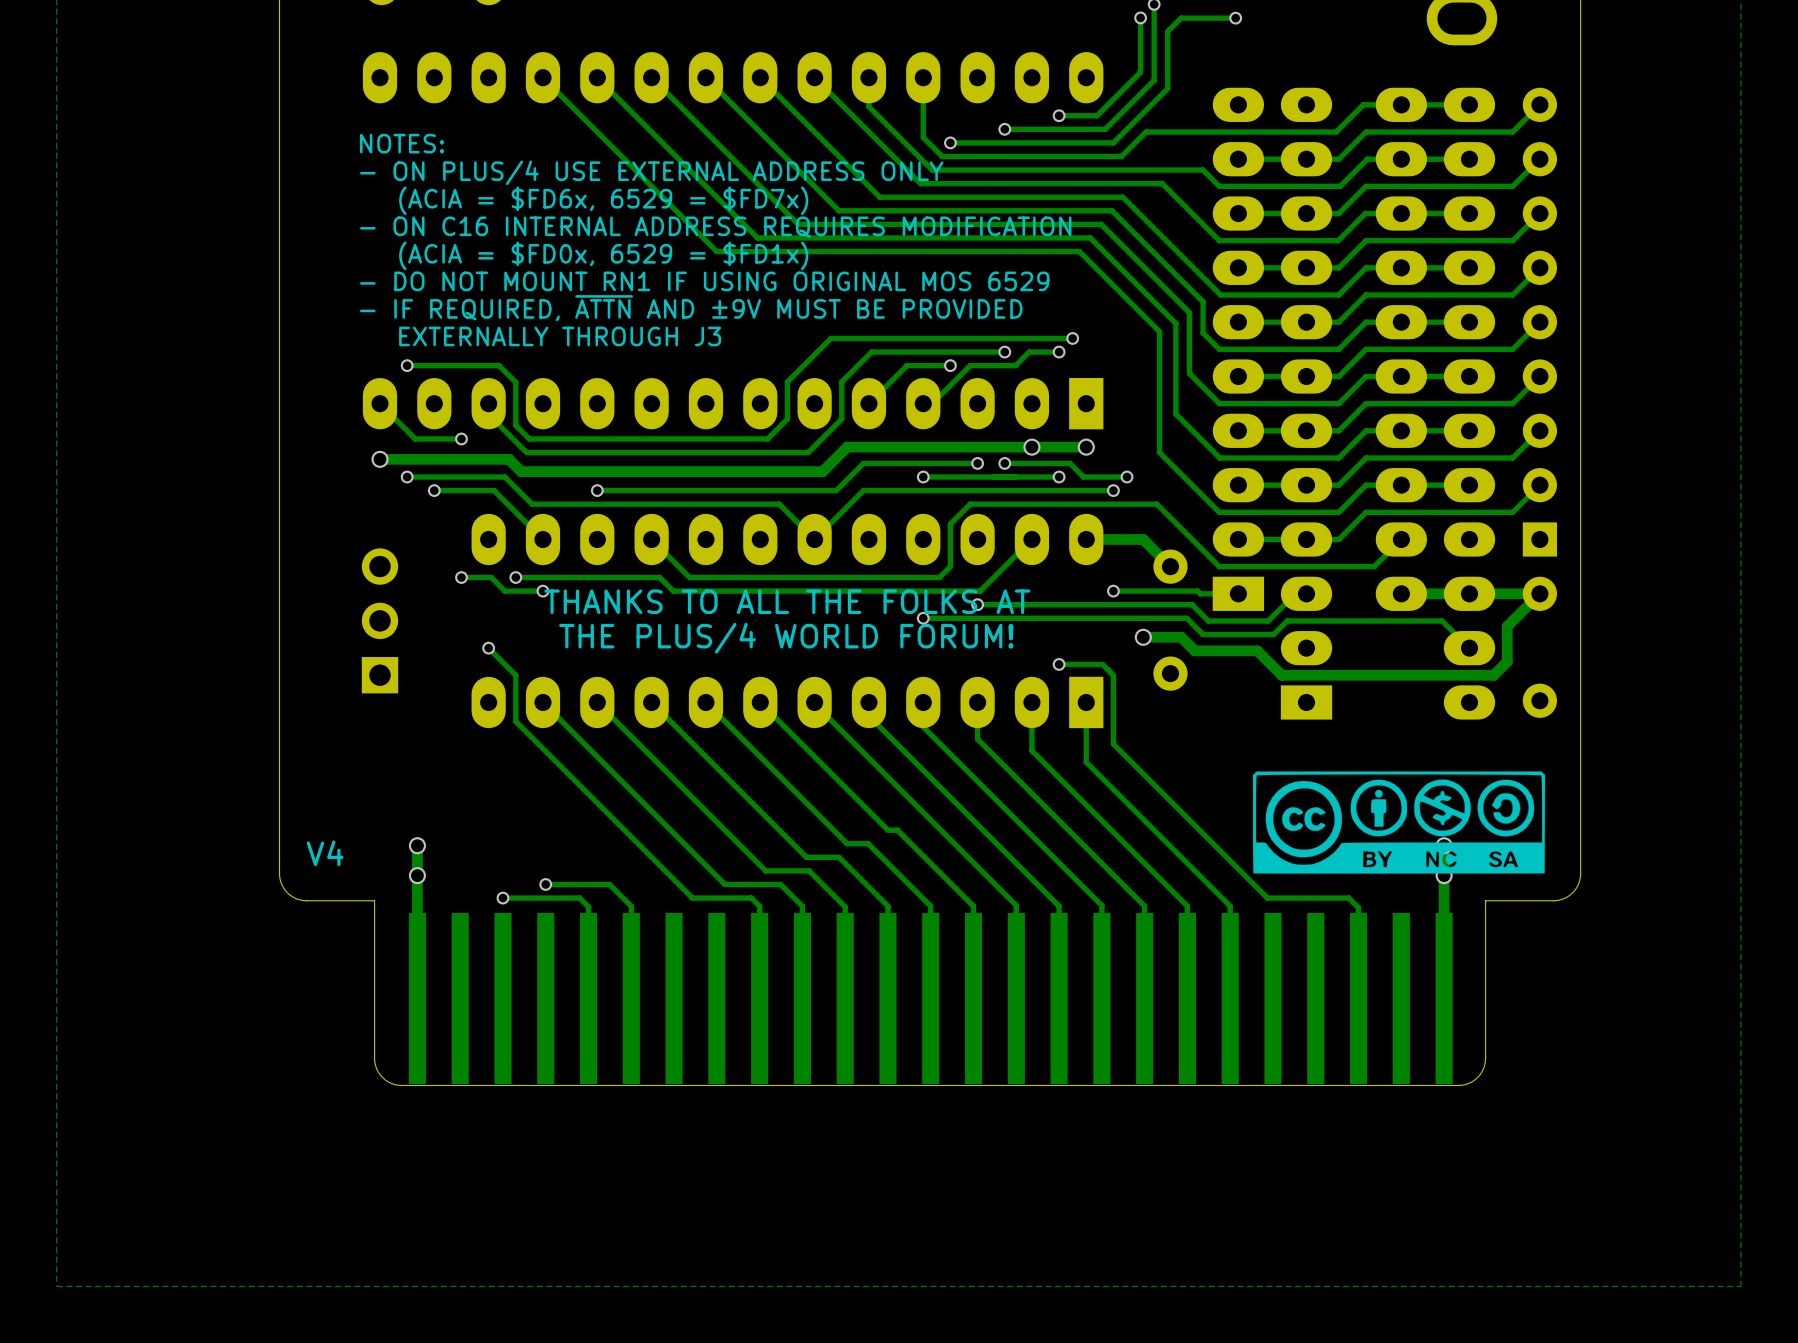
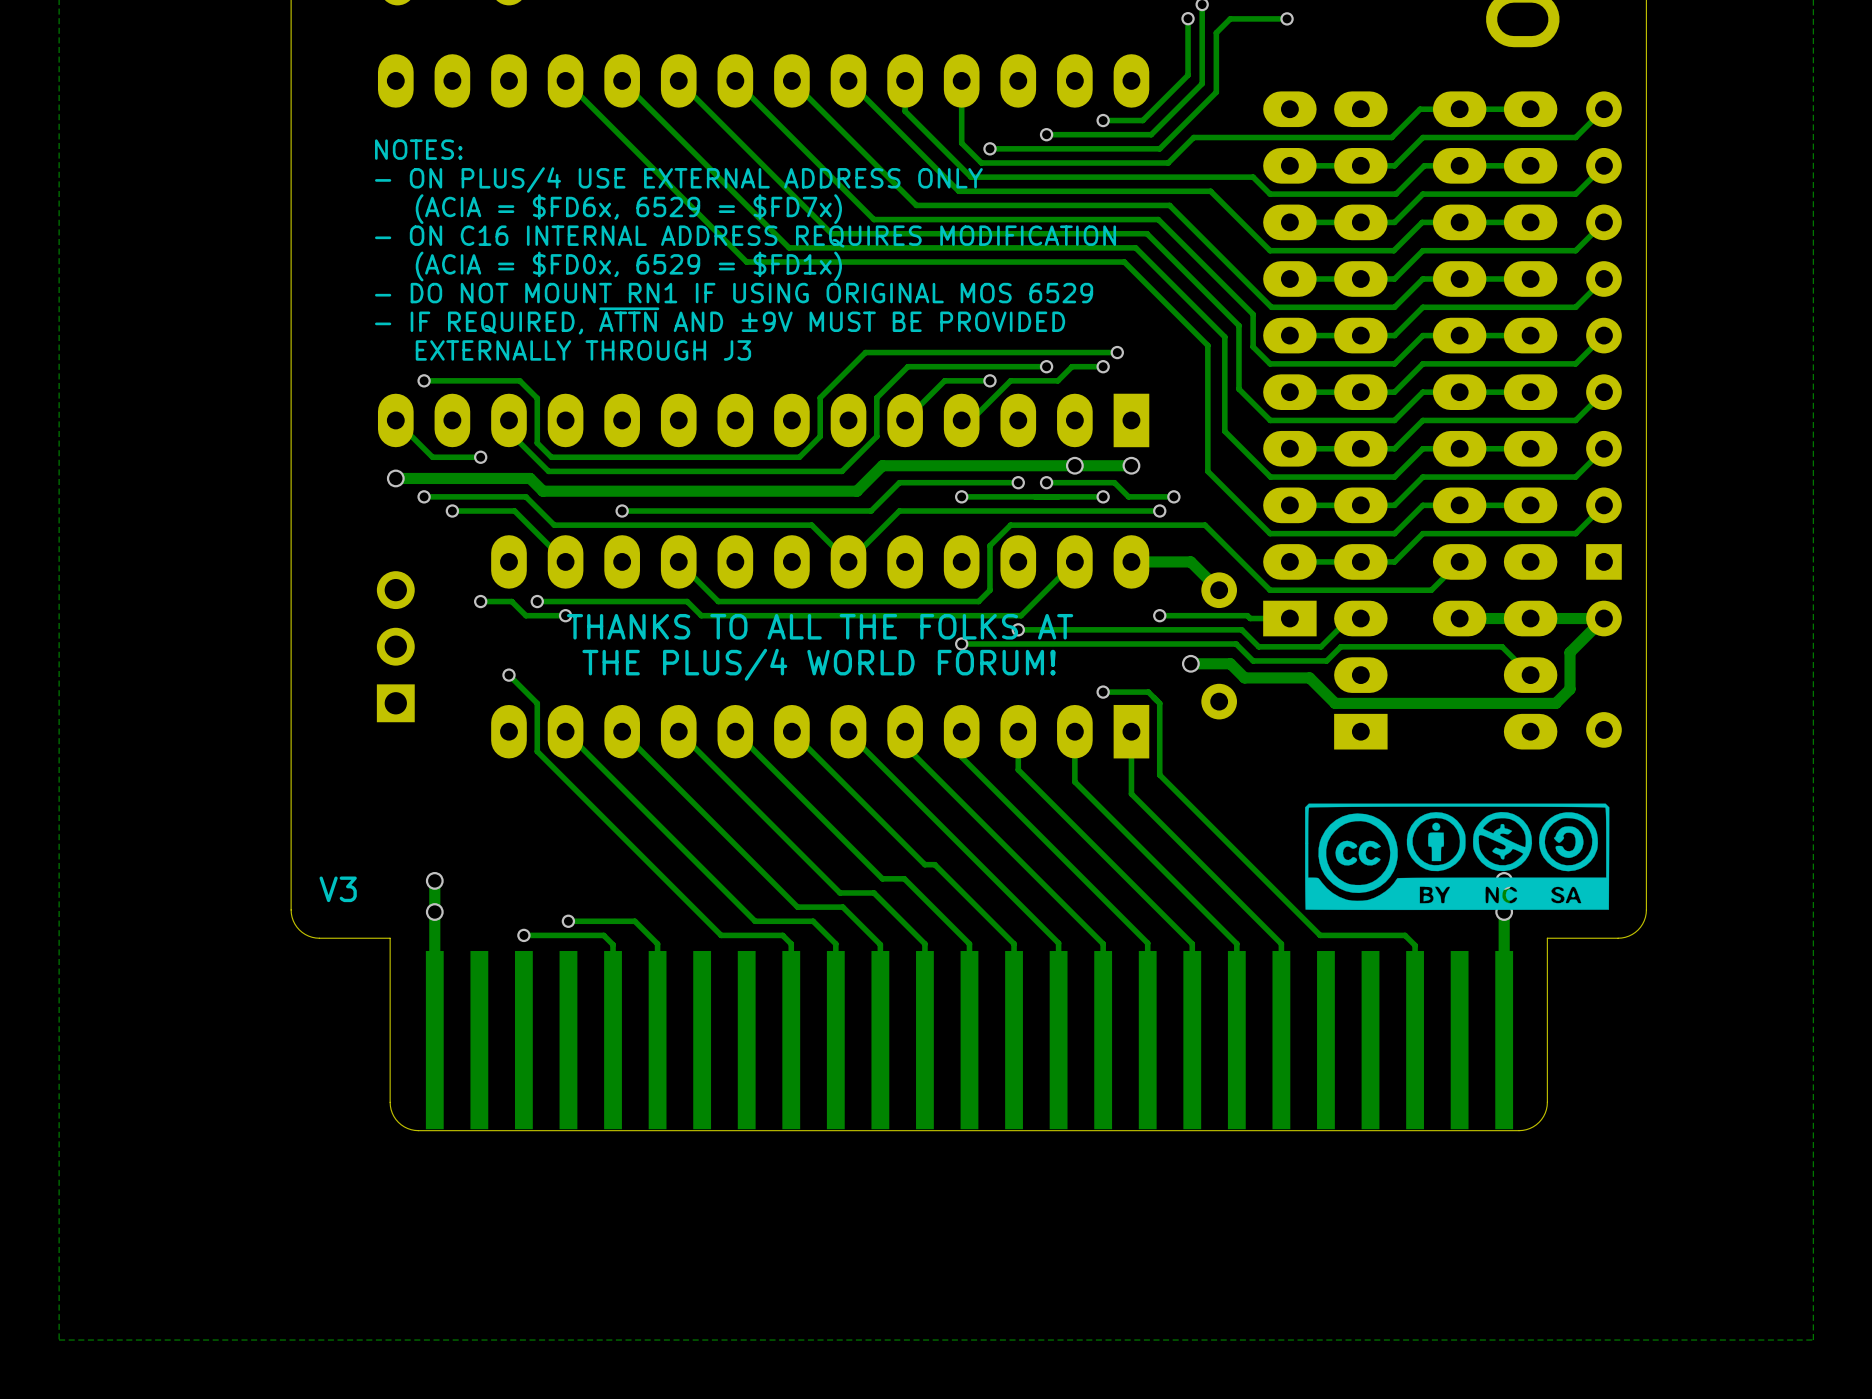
text: V4 (325, 853) -> V3 (338, 889)

